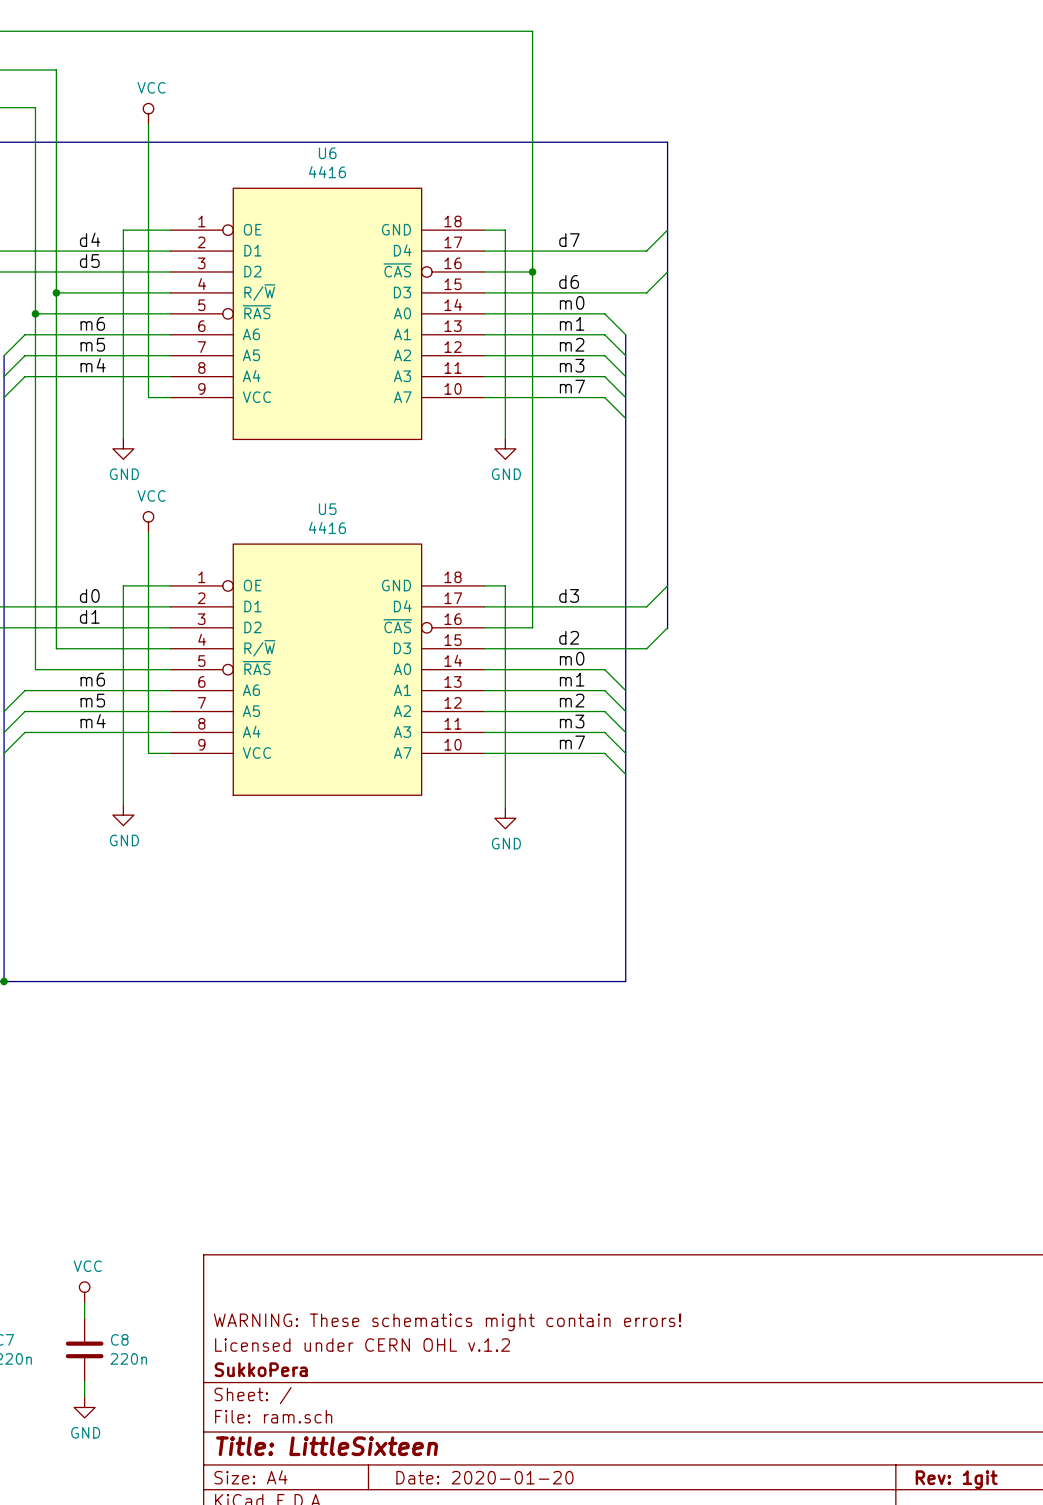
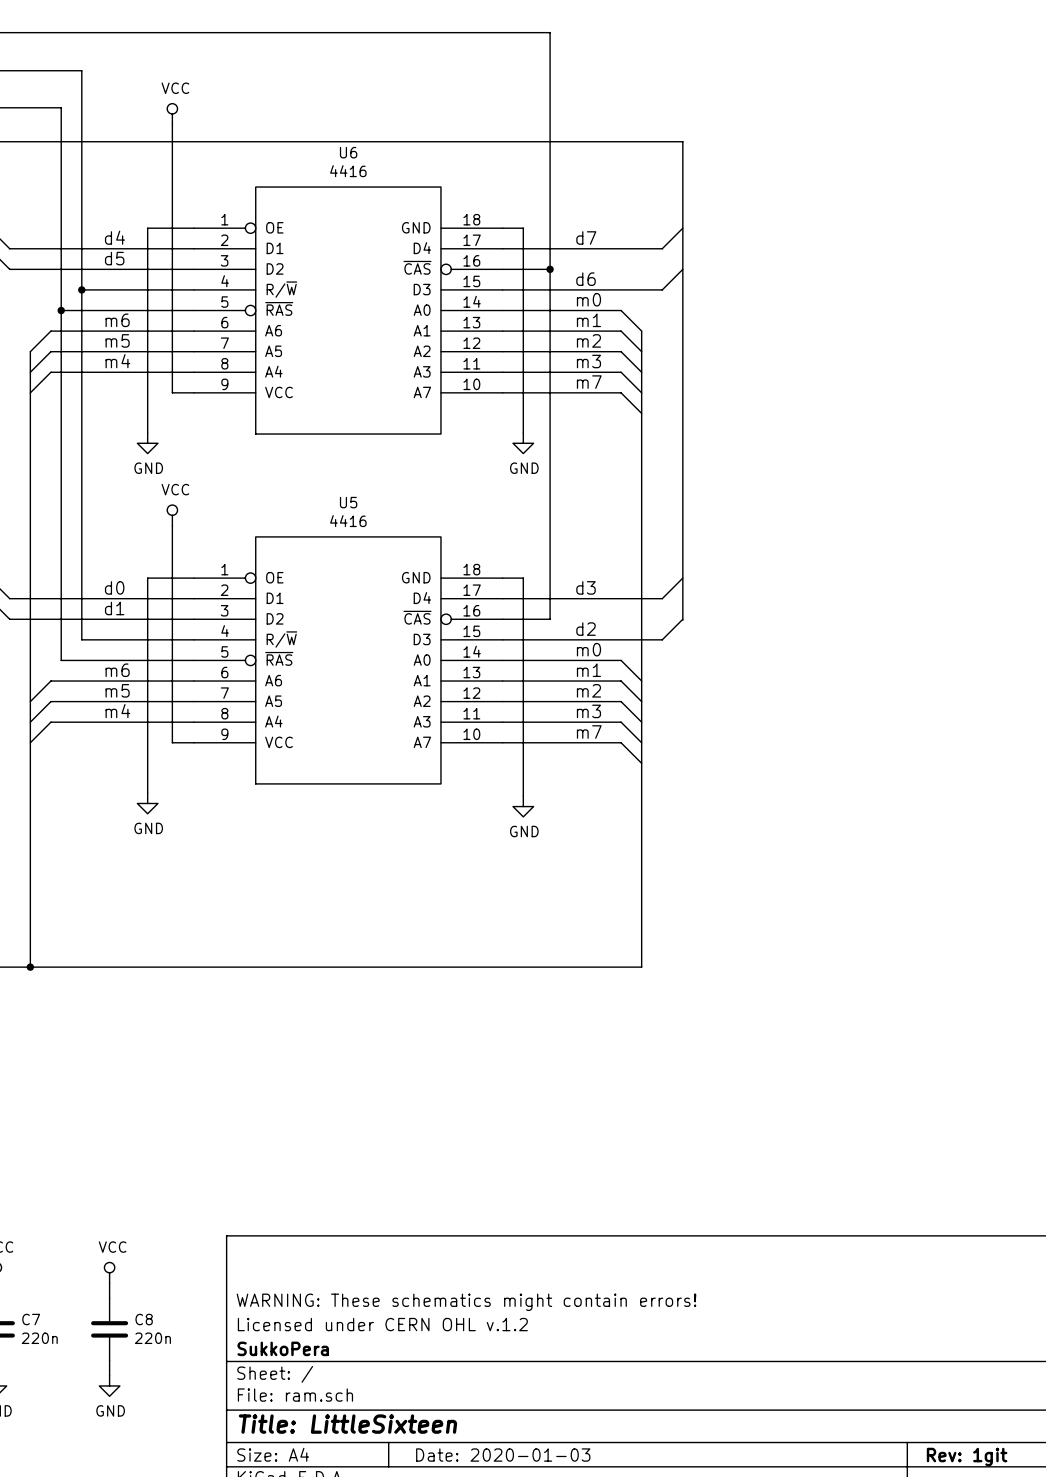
title block: Date: 2020-01-20 (484, 1477) -> Date: 2020-01-03 (503, 1455)

